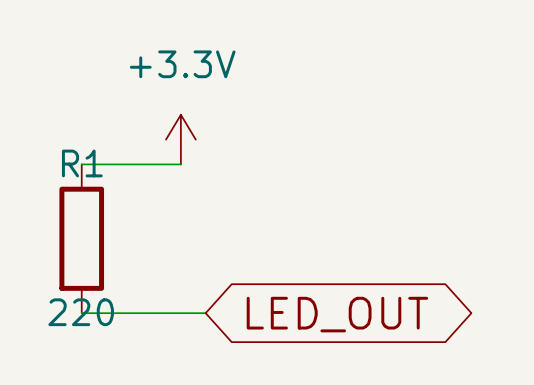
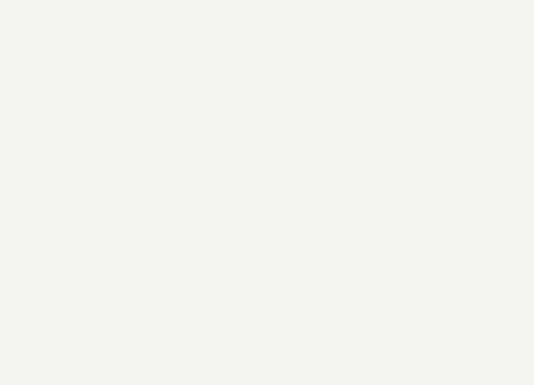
power symbol: +3.3V (180, 139) -> none
wire: (81, 164) (180, 164) -> none
R1: 220 (81, 238) -> none
wire: (81, 313) (205, 313) -> none
global label: LED_OUT (337, 314) -> none

